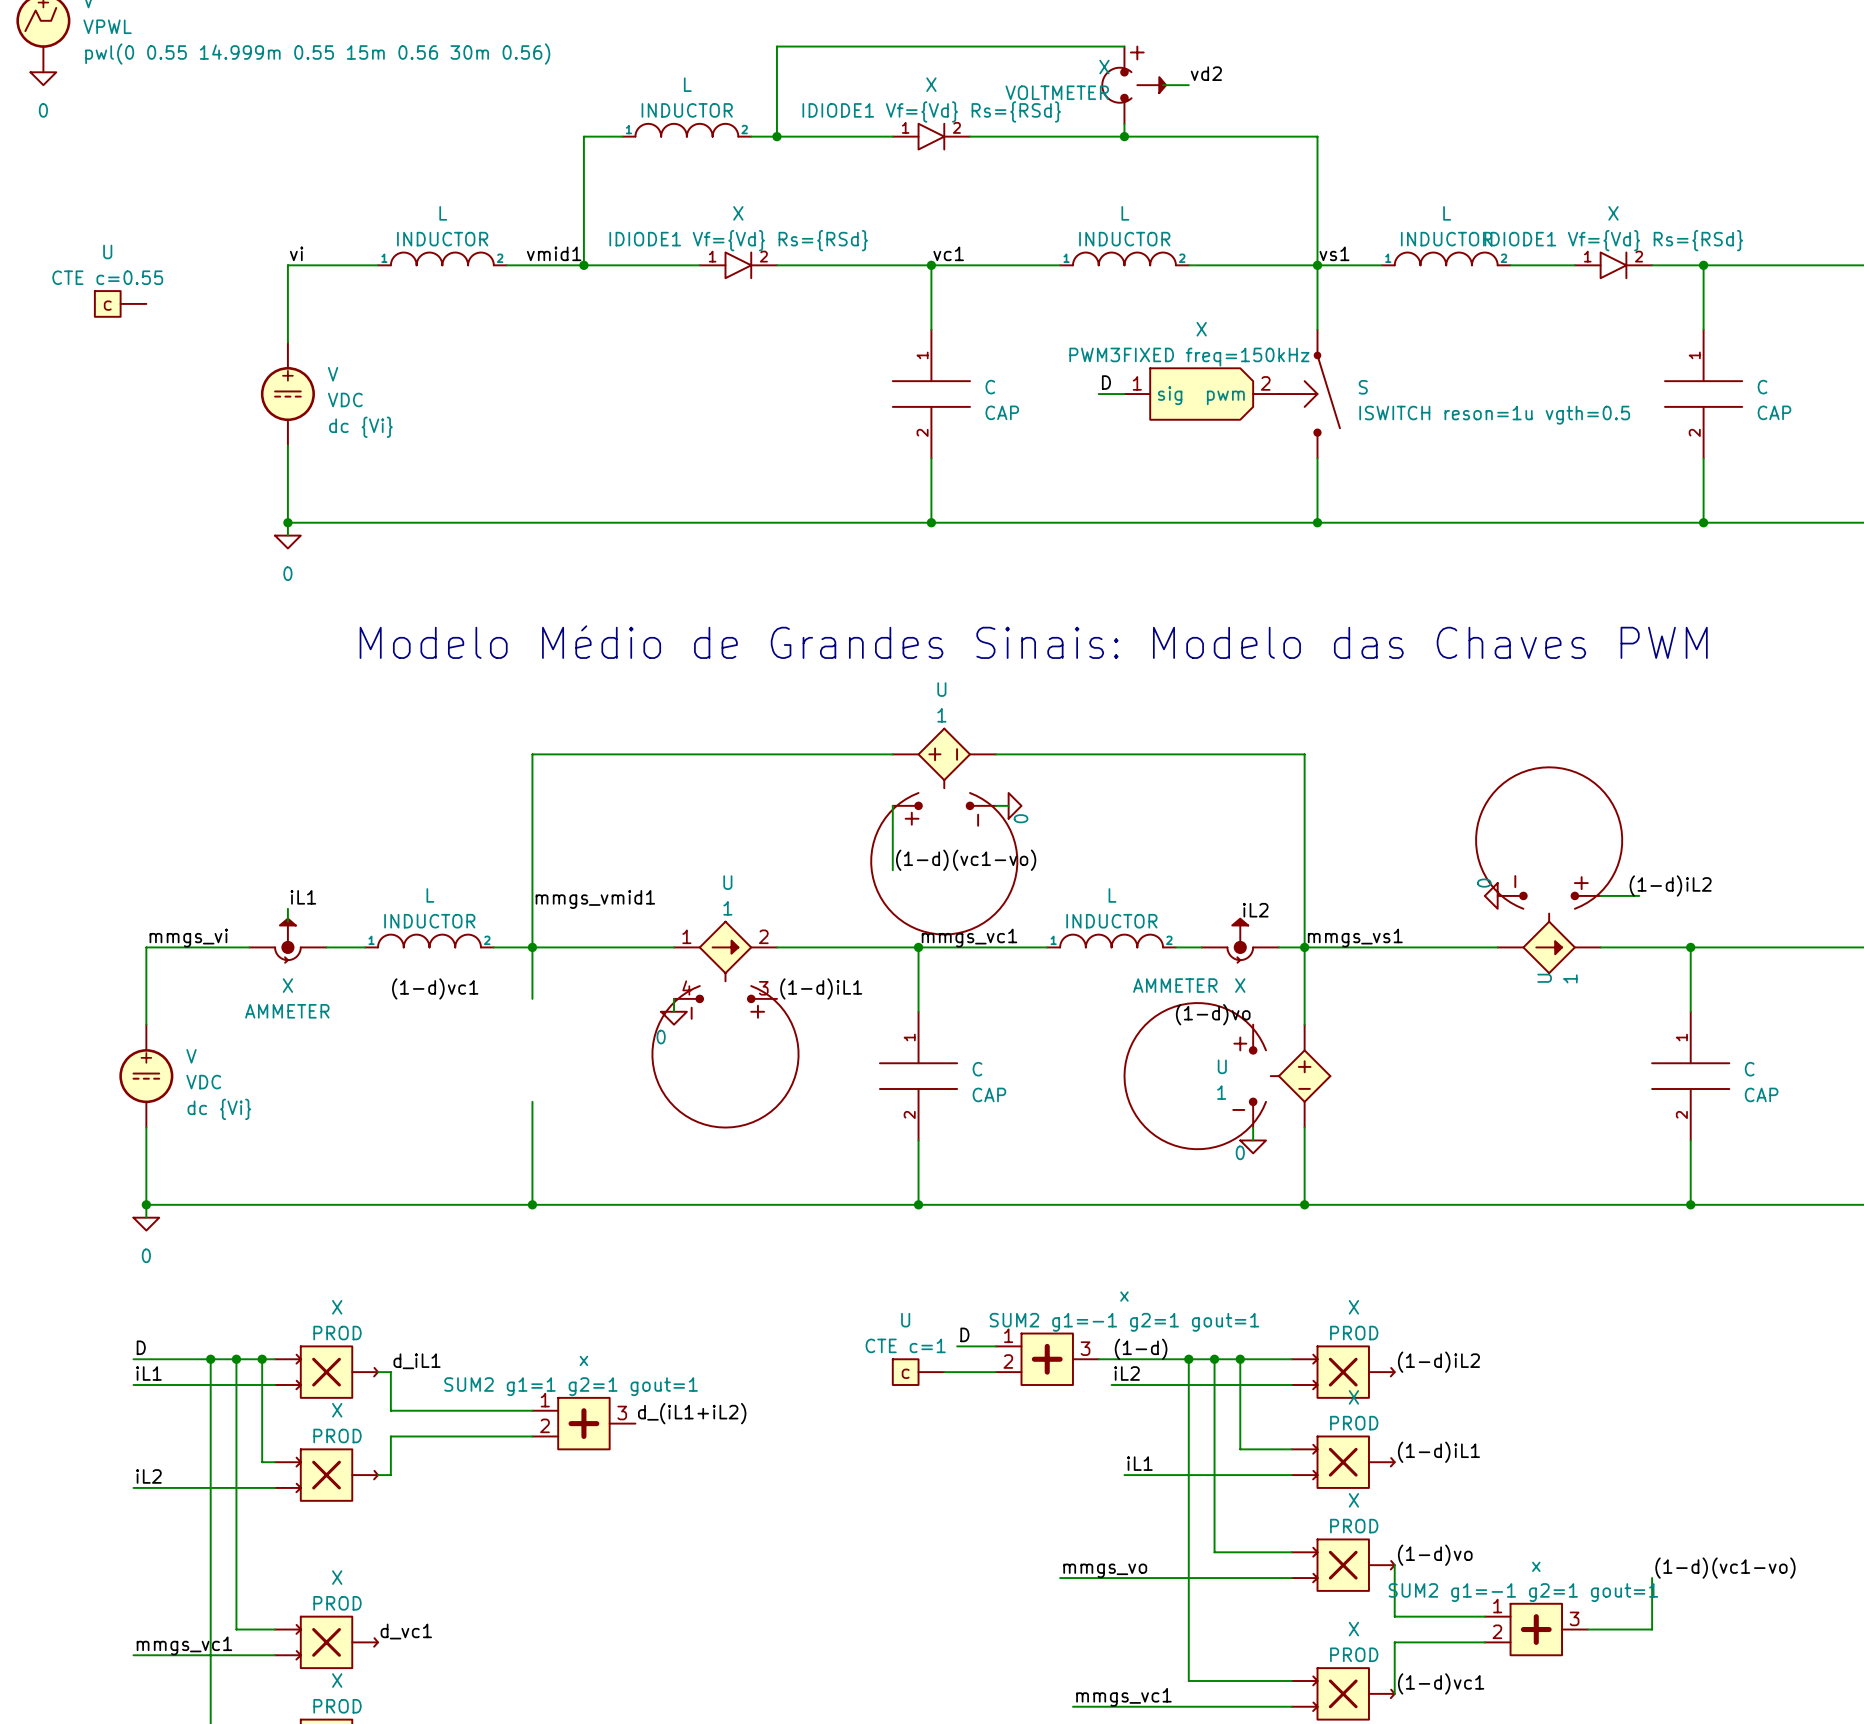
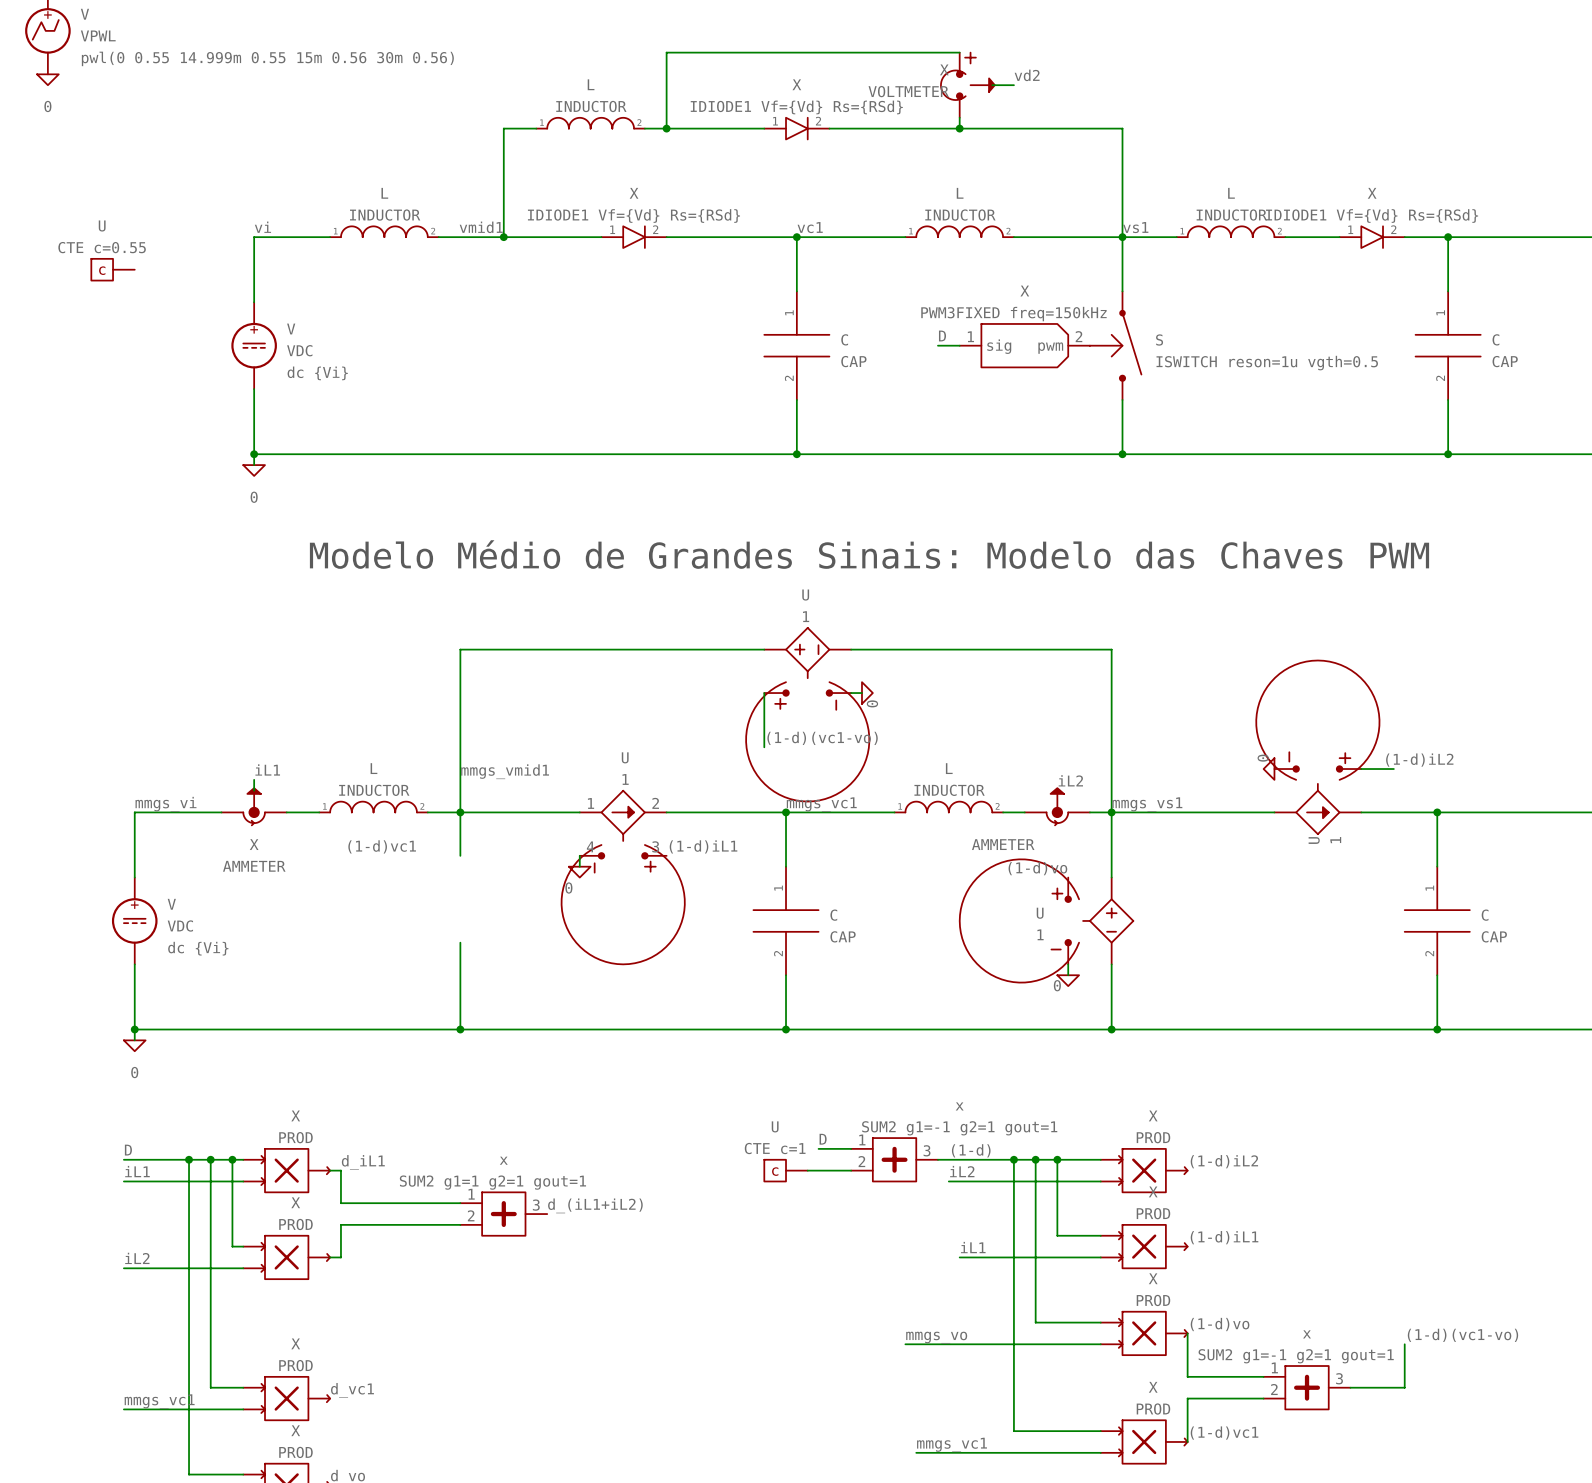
X name: X (1240, 985) -> none

